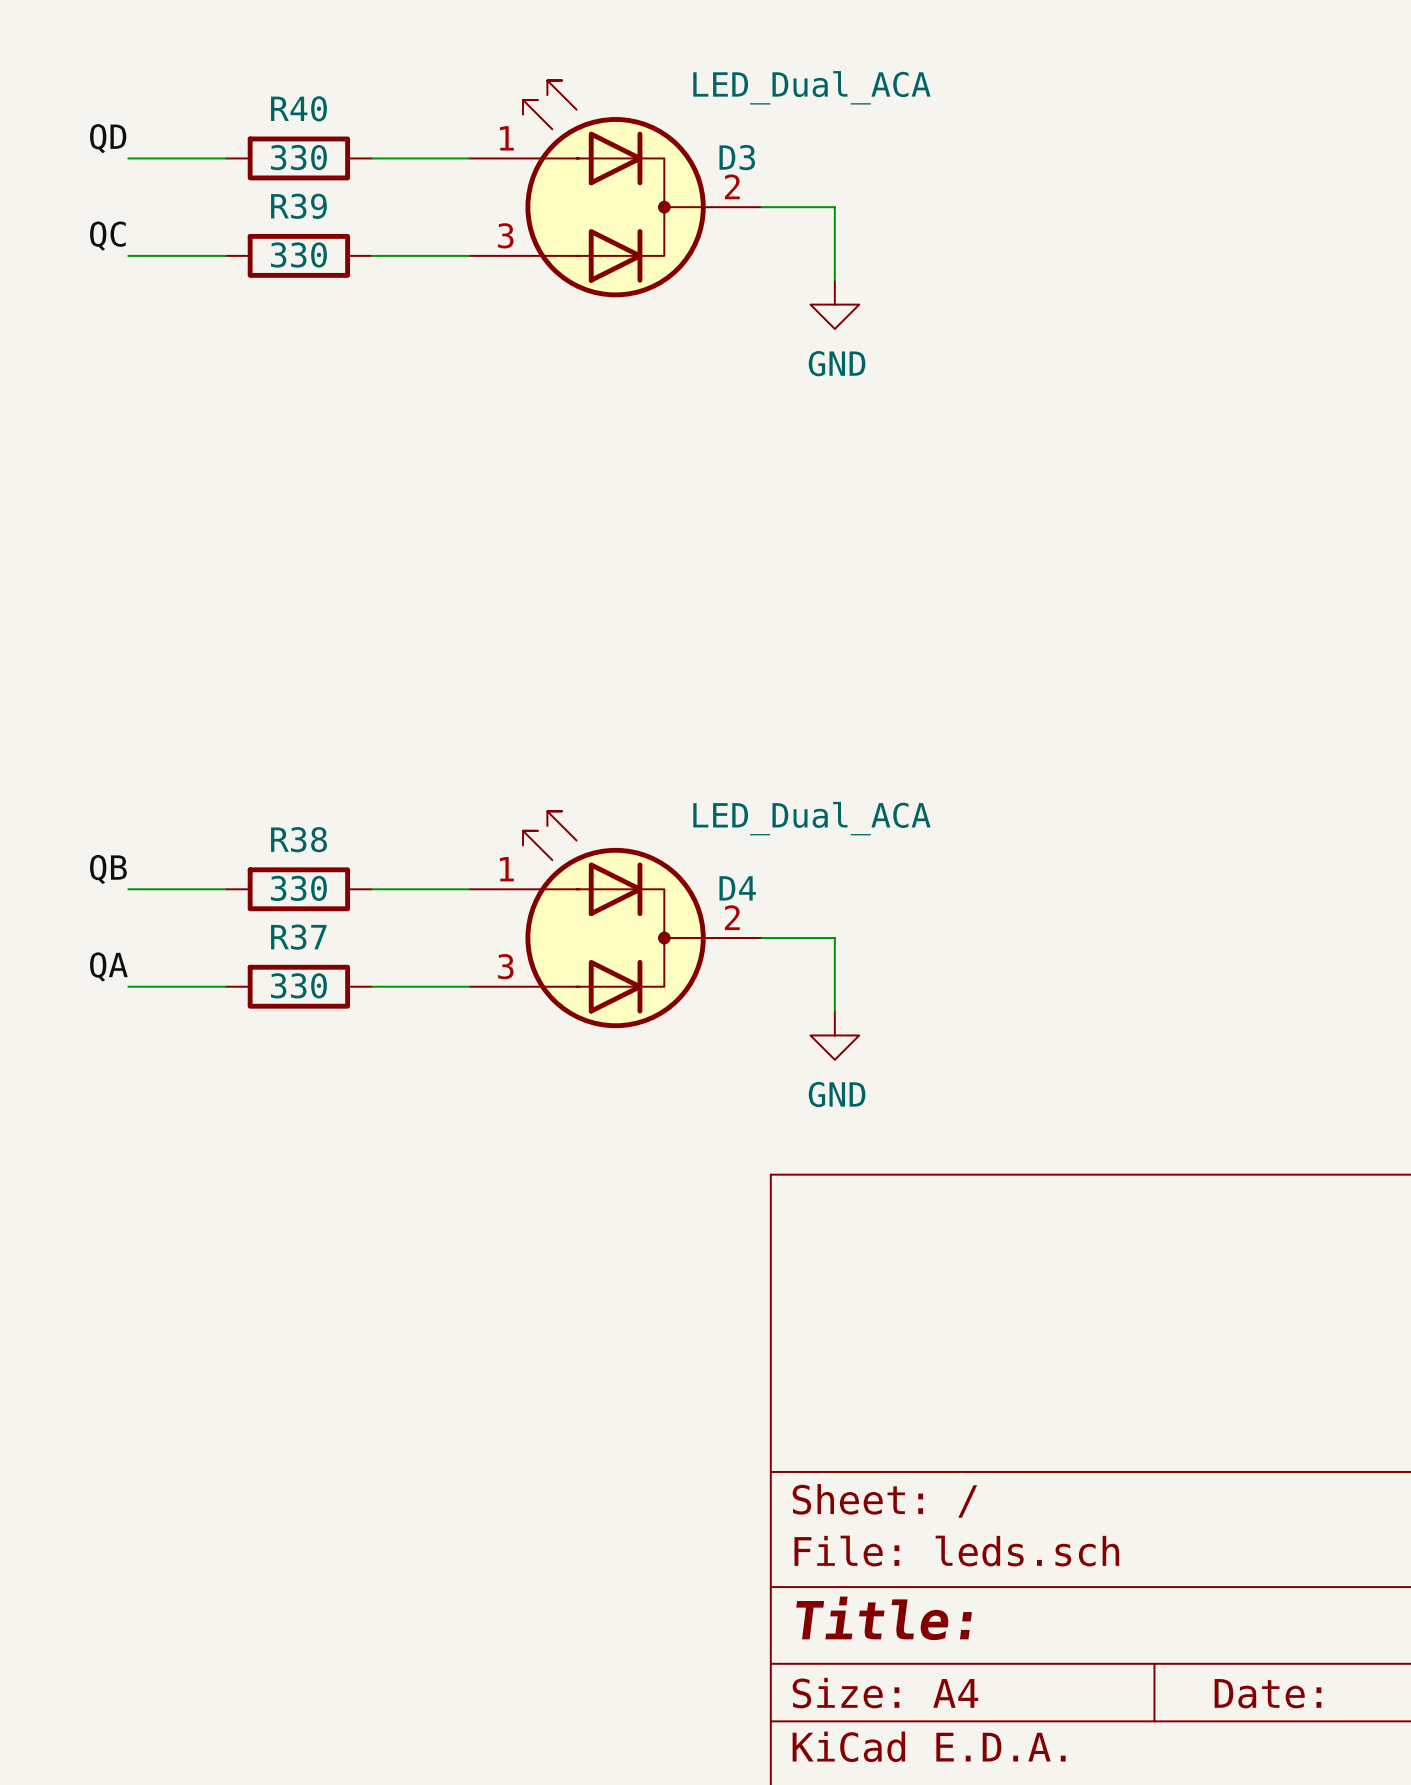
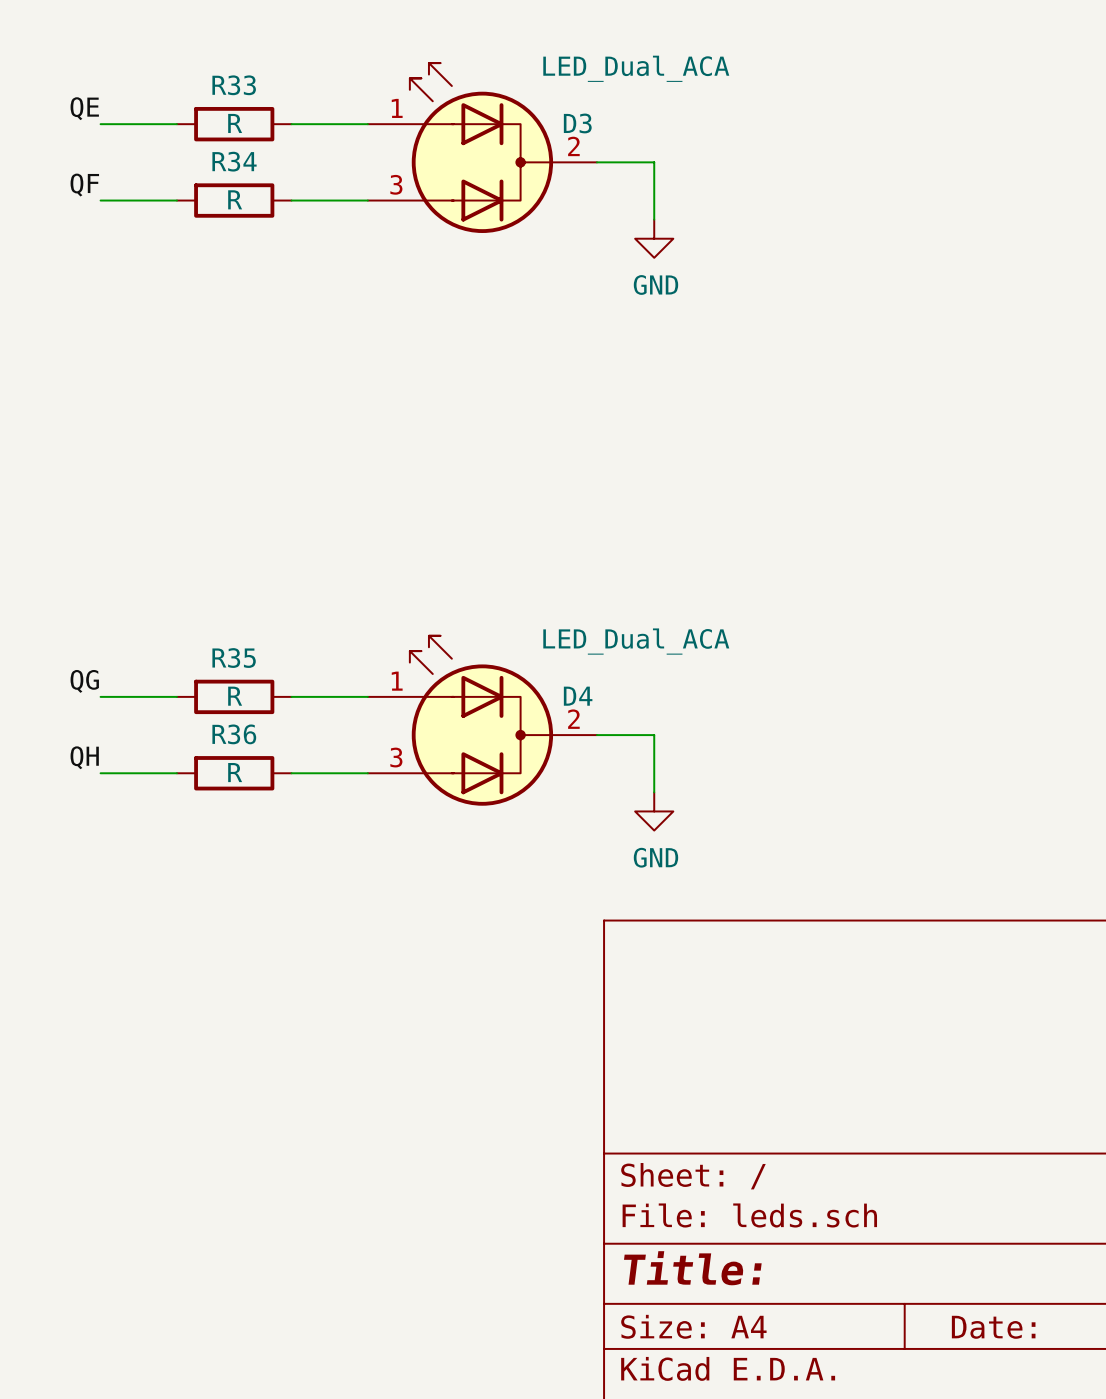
R40 name: R40 (298, 108) -> R33 (234, 85)
label: QD (108, 138) -> QE (84, 108)
R40 value: 330 (298, 157) -> R (235, 123)
R39 name: R39 (298, 206) -> R34 (234, 161)
label: QC (107, 236) -> QF (84, 185)
R39 value: 330 (298, 255) -> R (235, 199)
R38 name: R38 (298, 839) -> R35 (234, 658)
label: QB (108, 869) -> QG (84, 681)
R38 value: 330 (298, 888) -> R (235, 696)
R37 name: R37 (298, 937) -> R36 (234, 734)
label: QA (108, 966) -> QH (84, 757)
R37 value: 330 (298, 985) -> R (235, 772)

